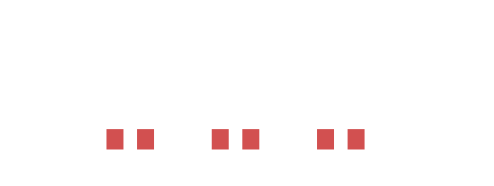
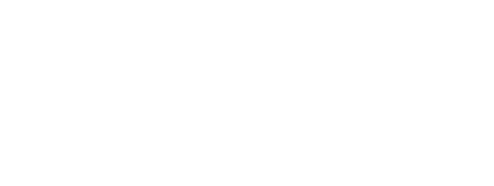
part: (130, 139) -> none
part: (235, 139) -> none
part: (340, 139) -> none

